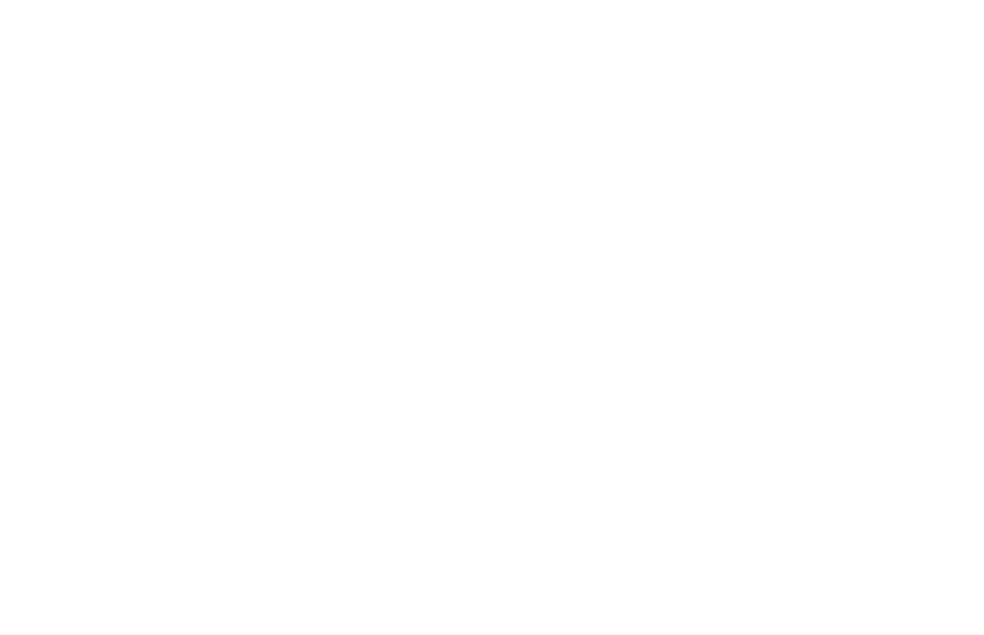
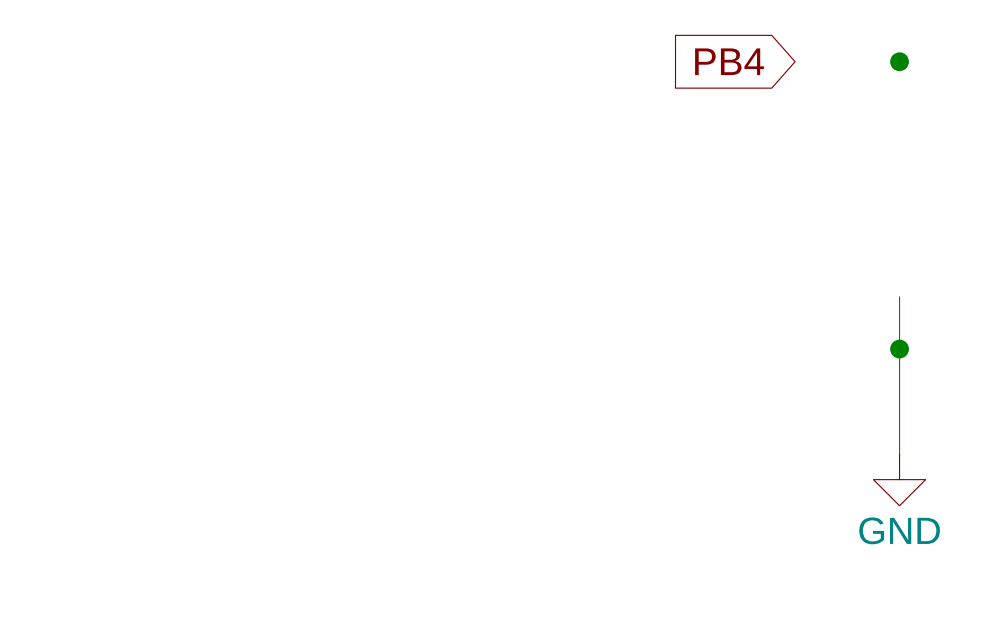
global label: none -> PB4 (729, 61)
junction: none -> (899, 61)
wire: none -> (899, 296) (899, 453)
junction: none -> (899, 349)
power symbol: none -> GND (899, 479)

